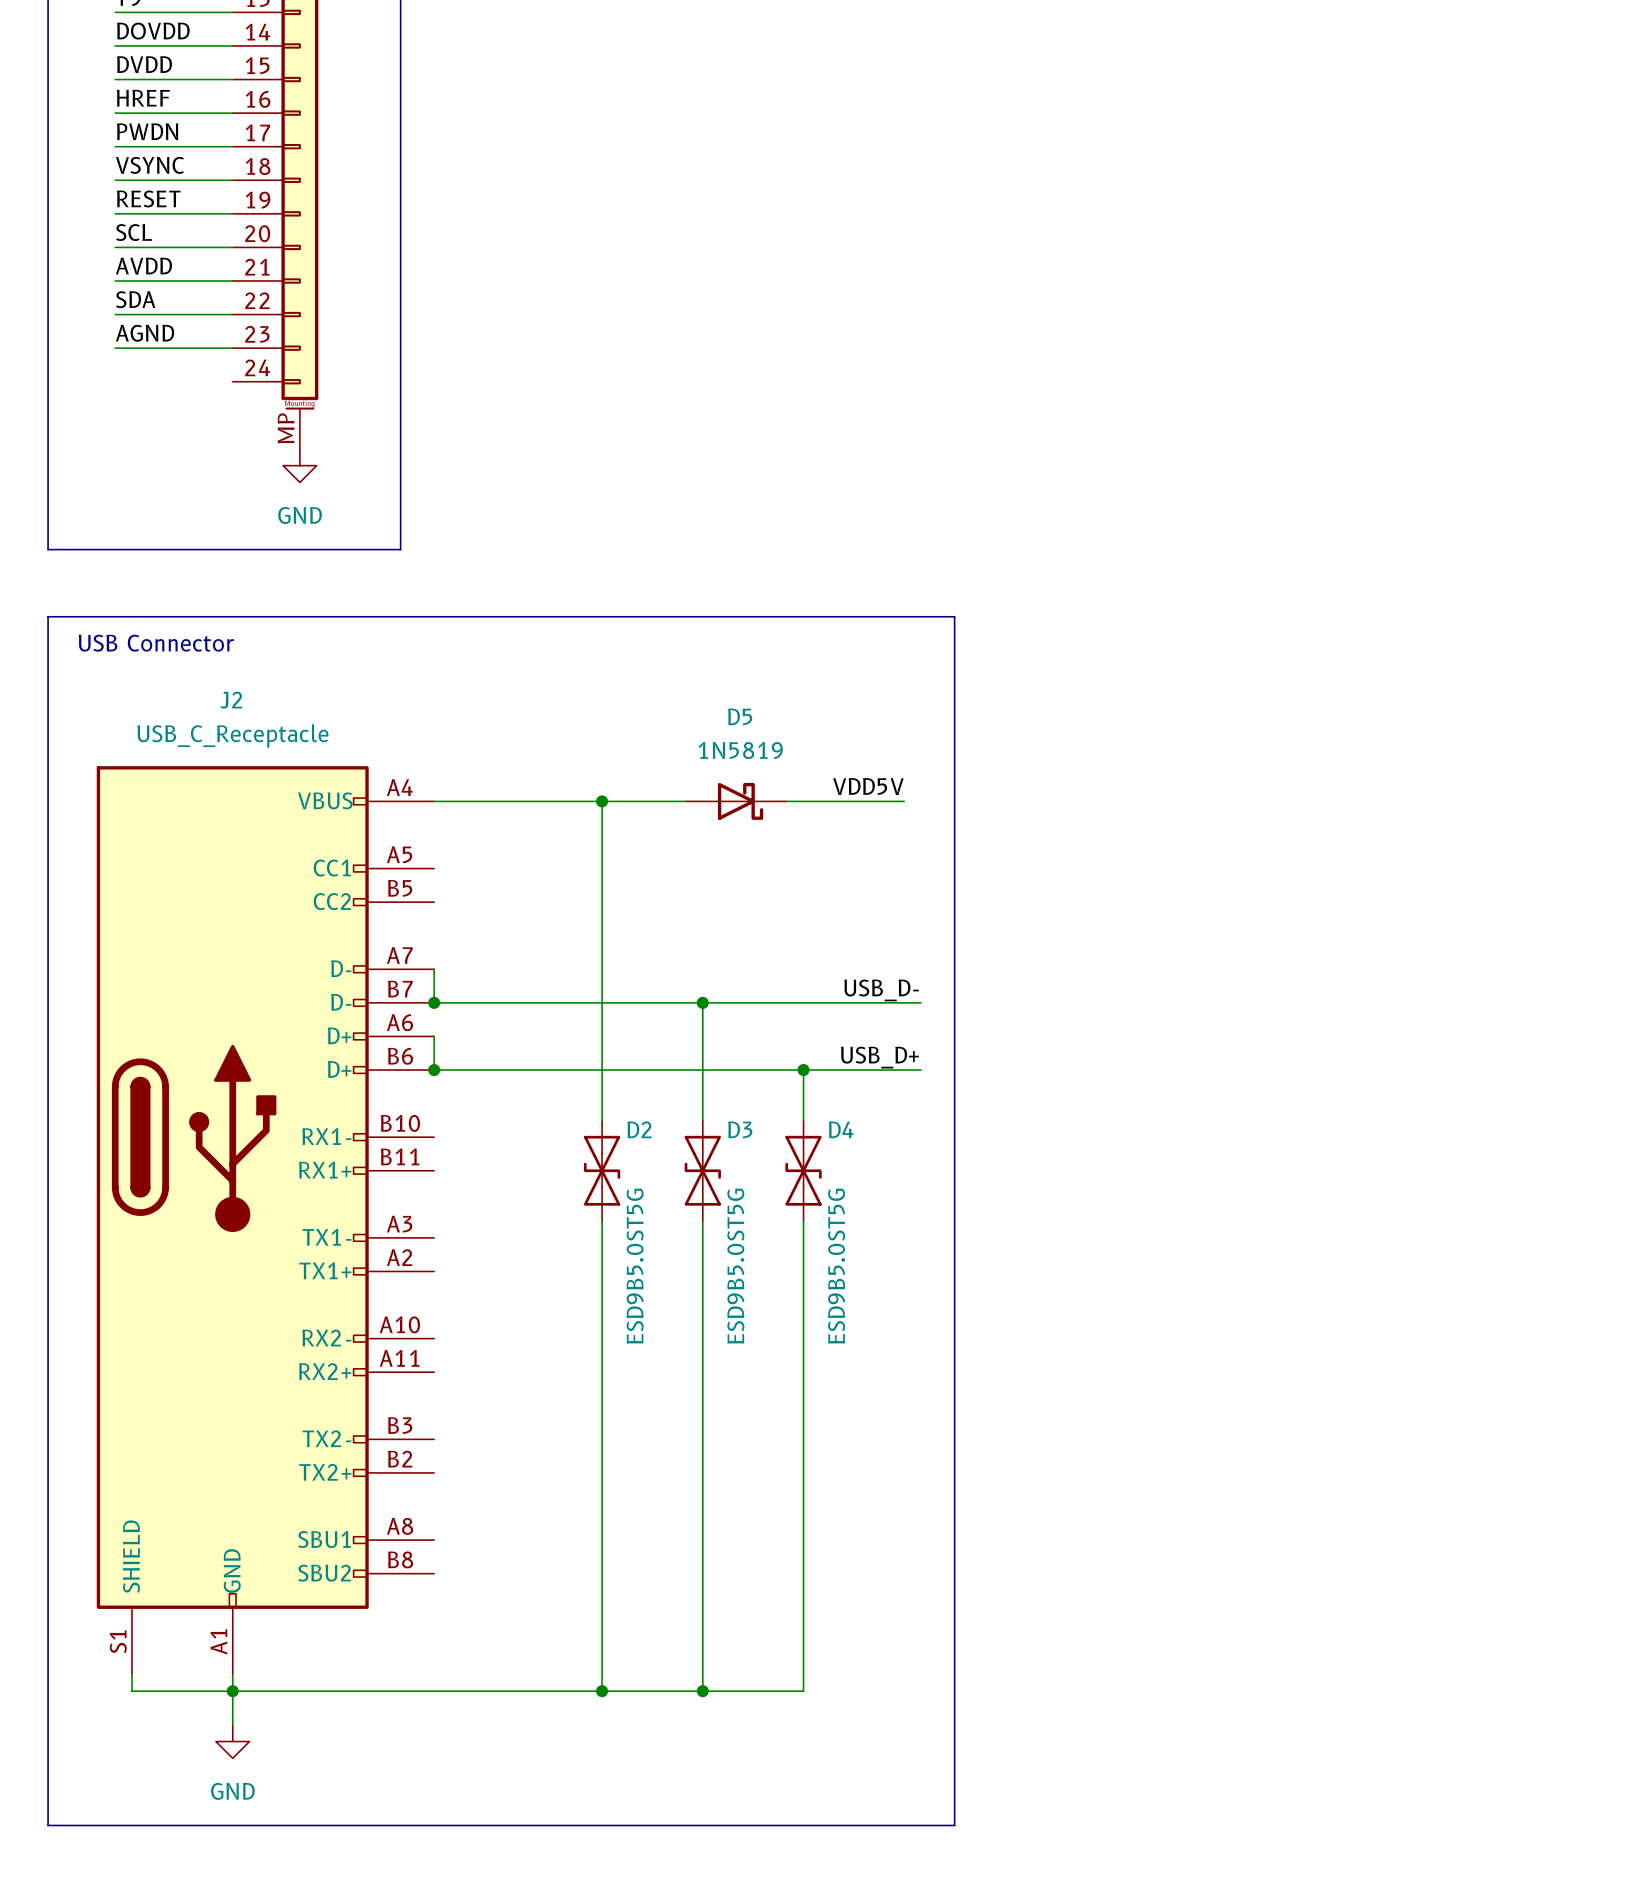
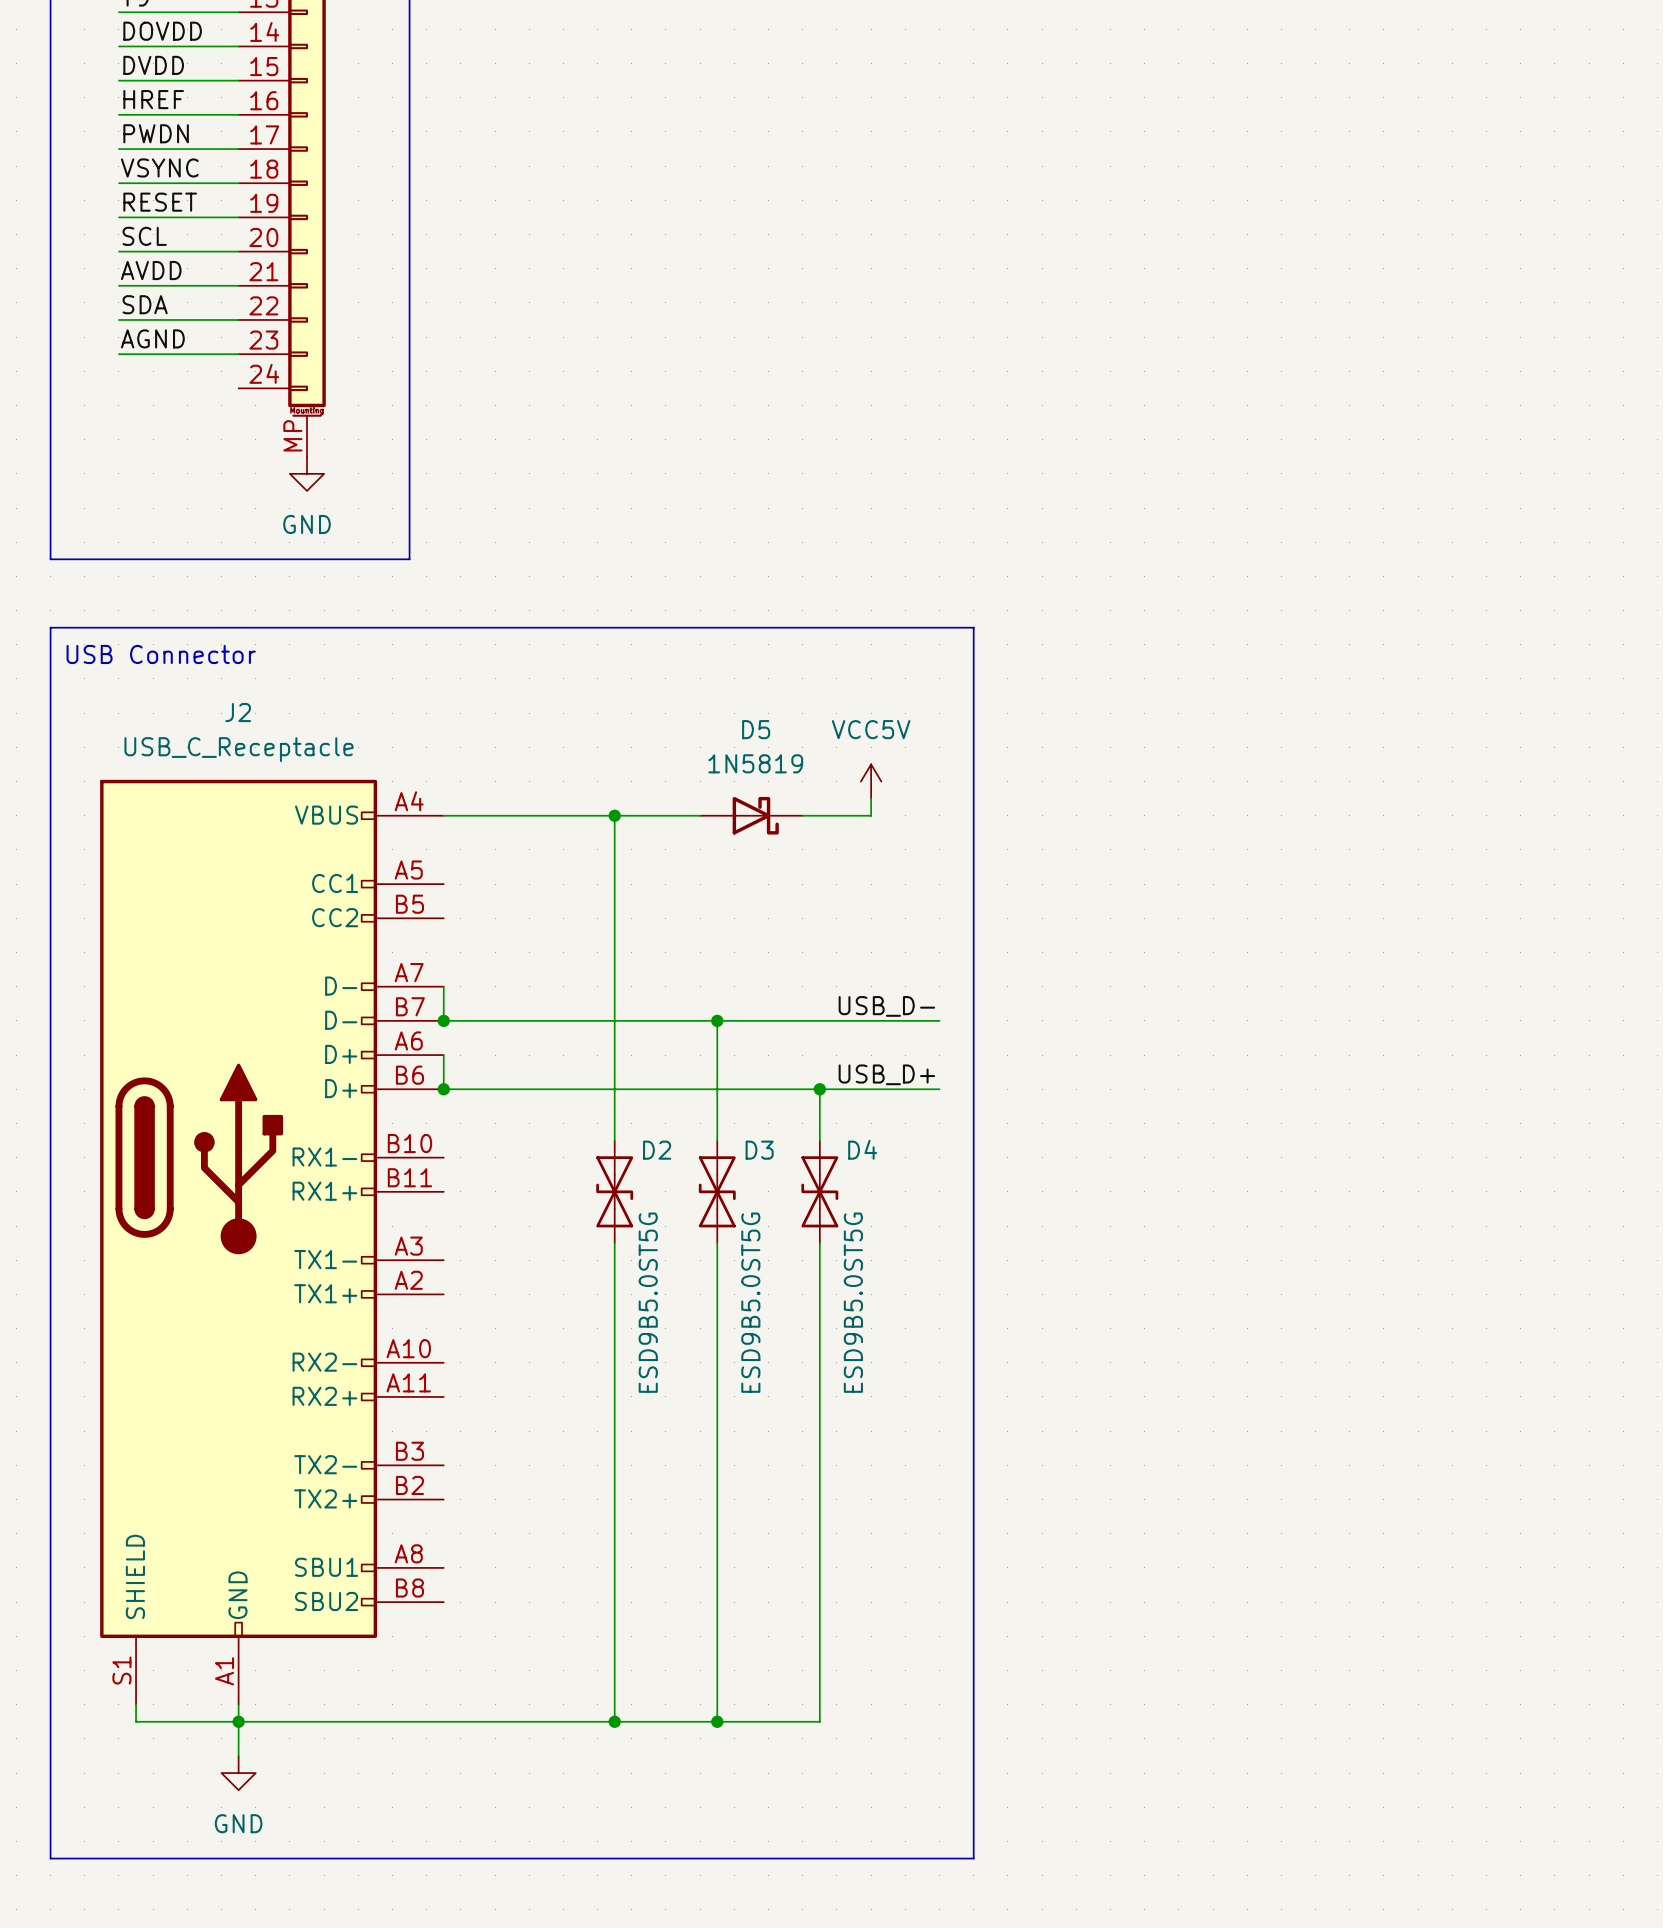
power symbol: none -> VCC5V (871, 781)
label: VDD5V (868, 786) -> none
wire: (853, 801) (904, 801) -> (871, 815) (871, 798)

